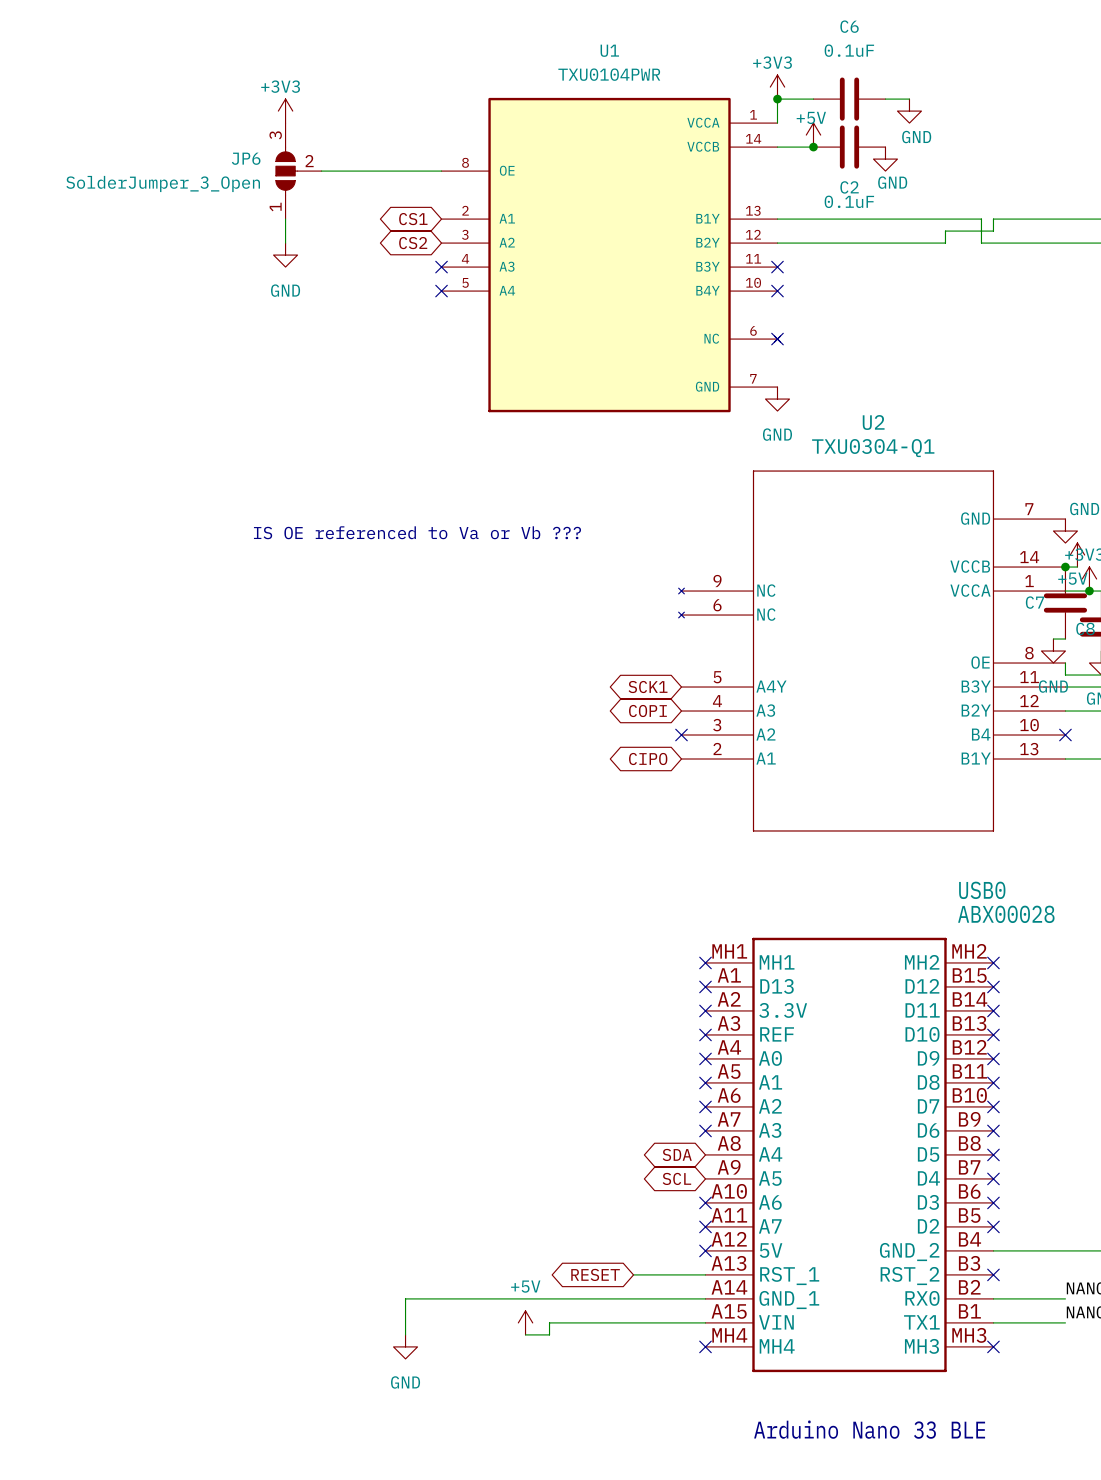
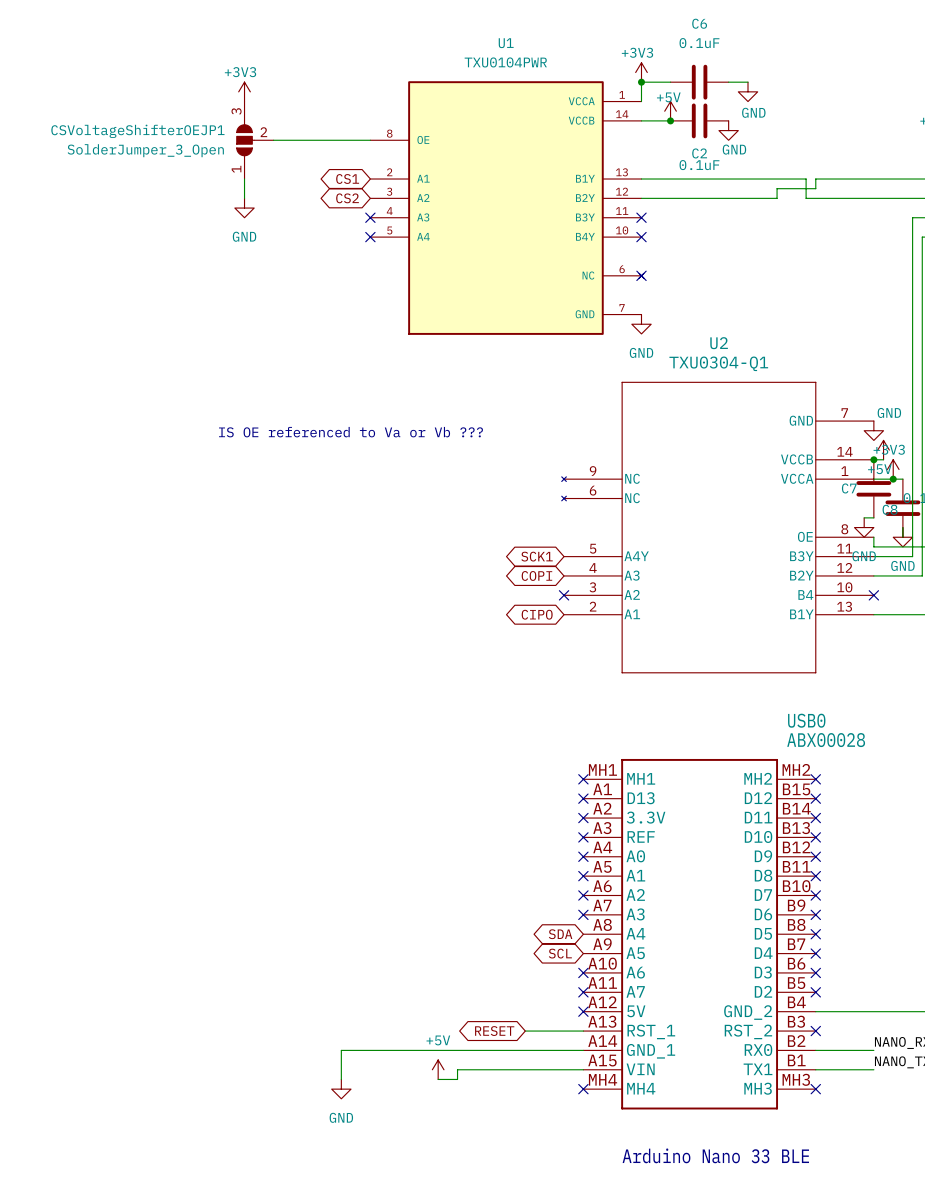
JP6 name: JP6 (246, 158) -> CSVoltageShifterOEJP1 (137, 131)

